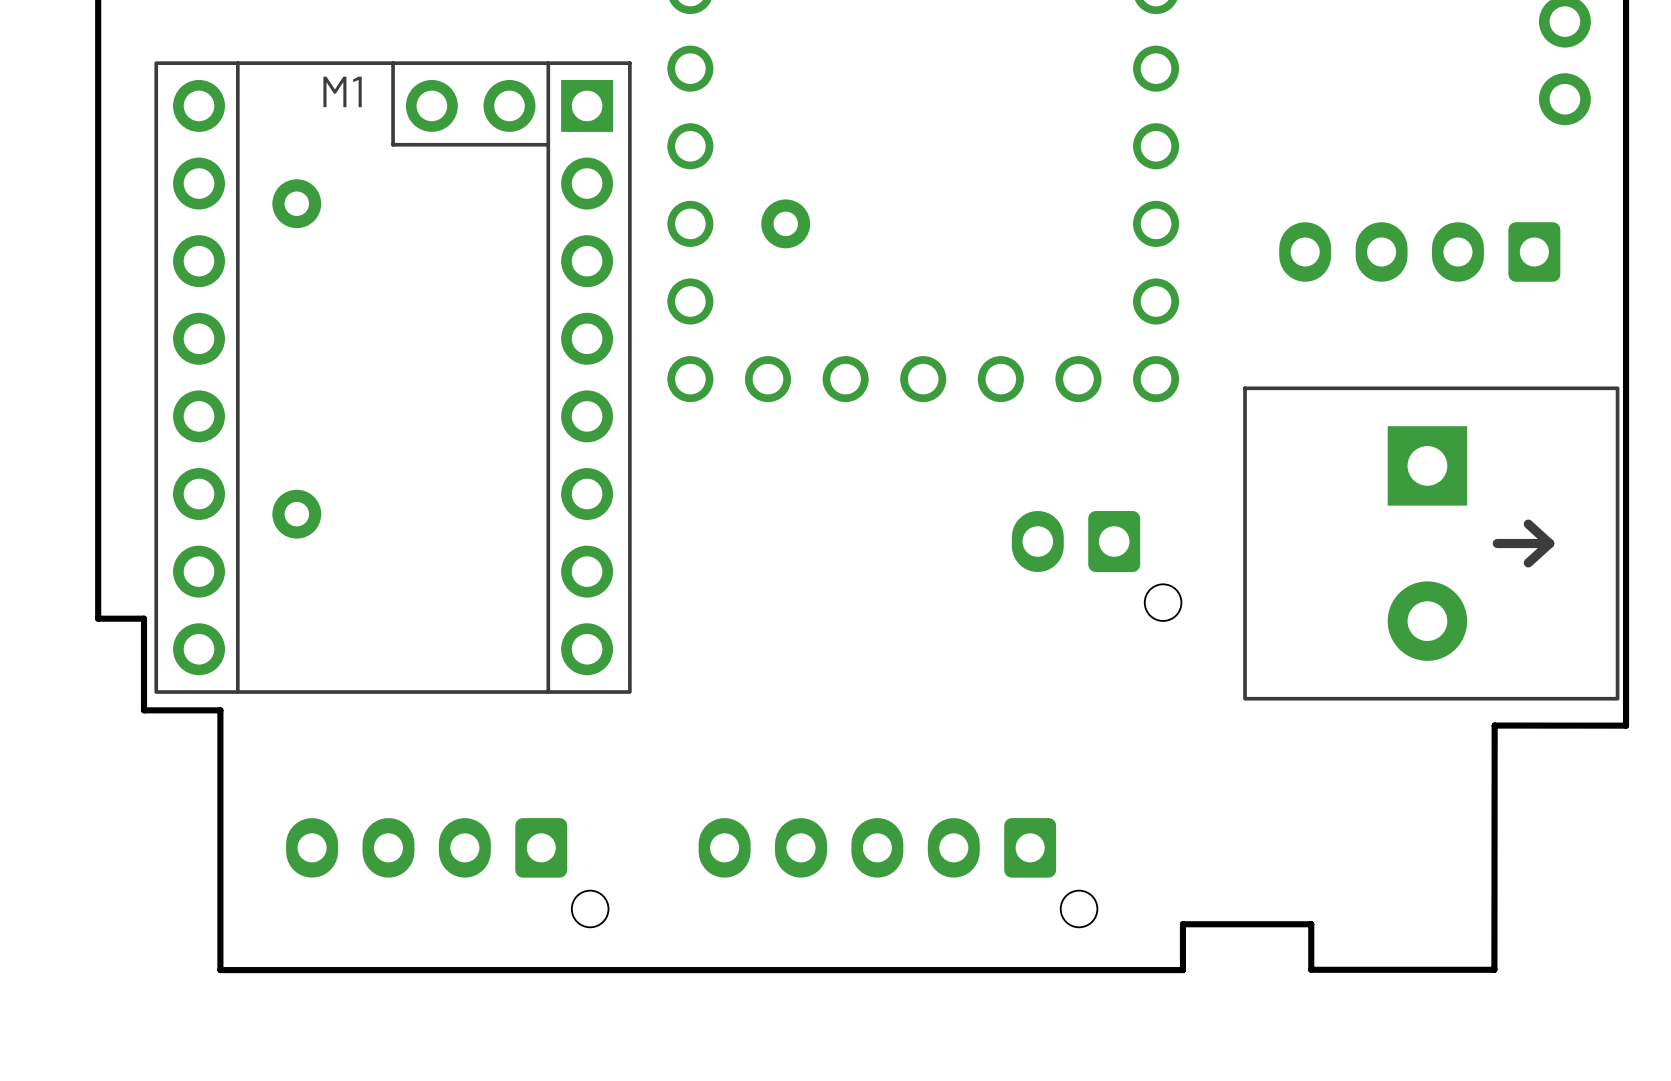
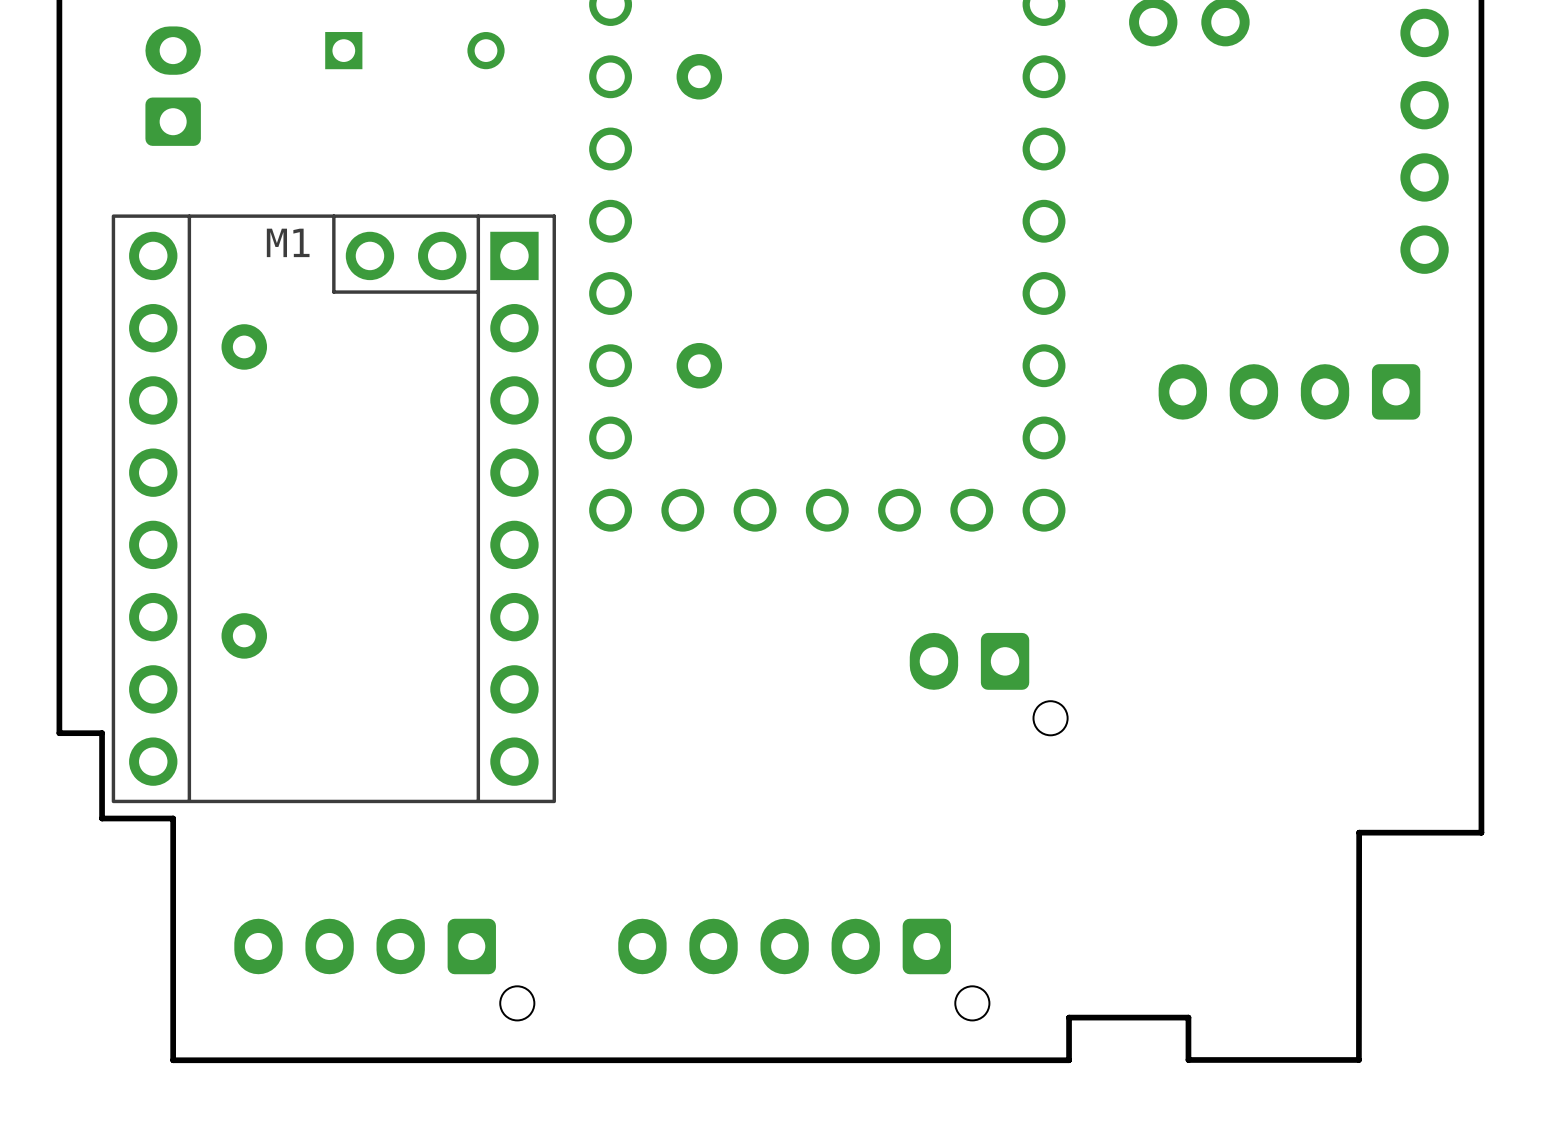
part: (1431, 543) -> none

